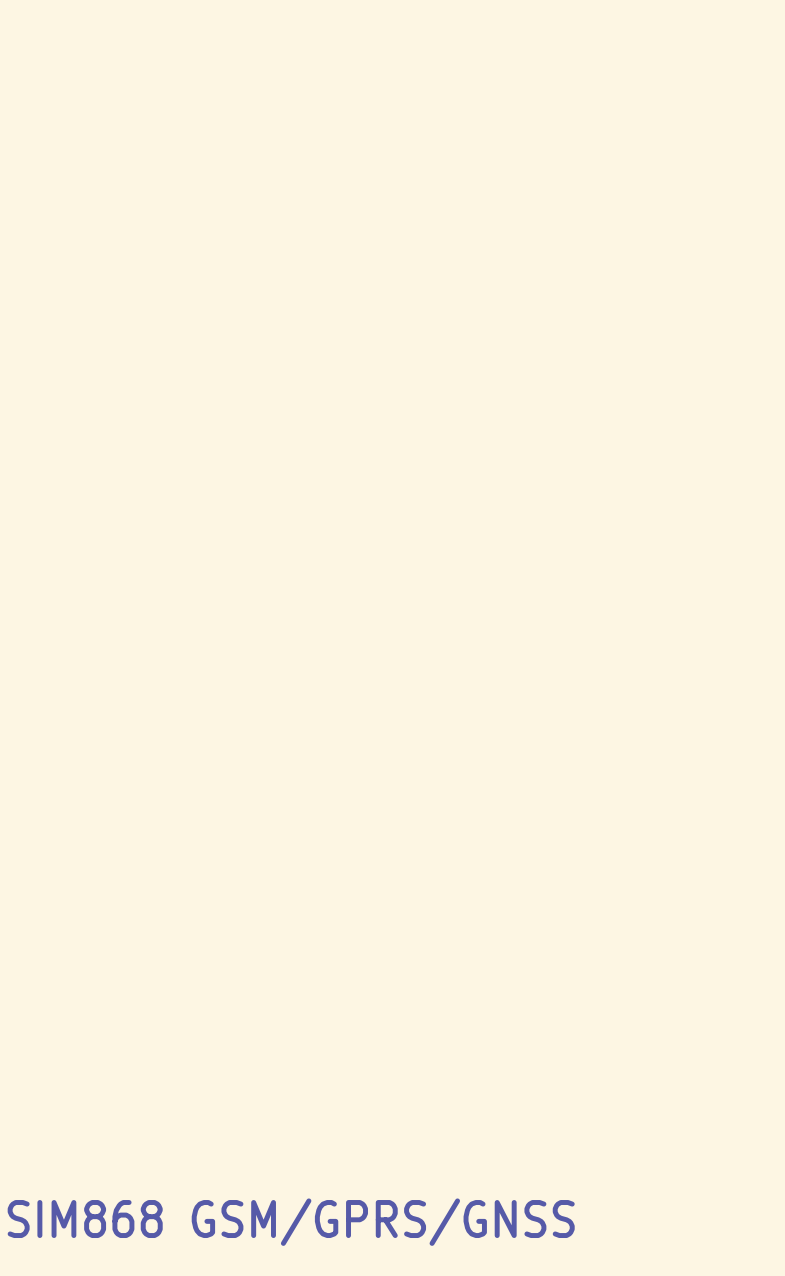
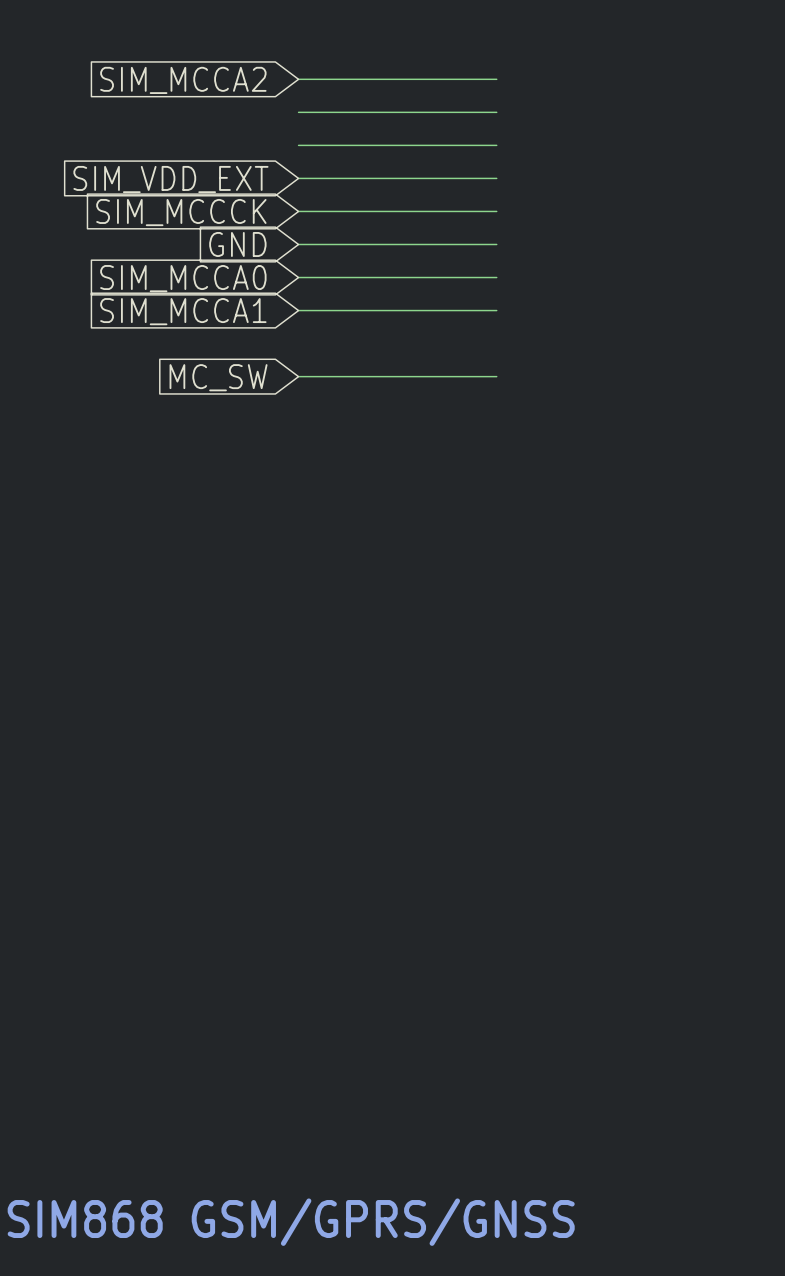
wire: none -> (298, 79) (496, 79)
global label: none -> SIM_MCCA2 (183, 80)
wire: none -> (298, 112) (496, 112)
wire: none -> (298, 145) (496, 145)
wire: none -> (298, 178) (496, 178)
global label: none -> SIM_VDD_EXT (170, 179)
wire: none -> (298, 211) (496, 211)
global label: none -> SIM_MCCCK (181, 212)
global label: none -> GND (237, 244)
wire: none -> (298, 244) (496, 244)
wire: none -> (298, 277) (496, 277)
global label: none -> SIM_MCCA0 (183, 278)
wire: none -> (298, 310) (496, 310)
global label: none -> SIM_MCCA1 (183, 311)
wire: none -> (298, 376) (496, 376)
global label: none -> MC_SW (218, 377)

